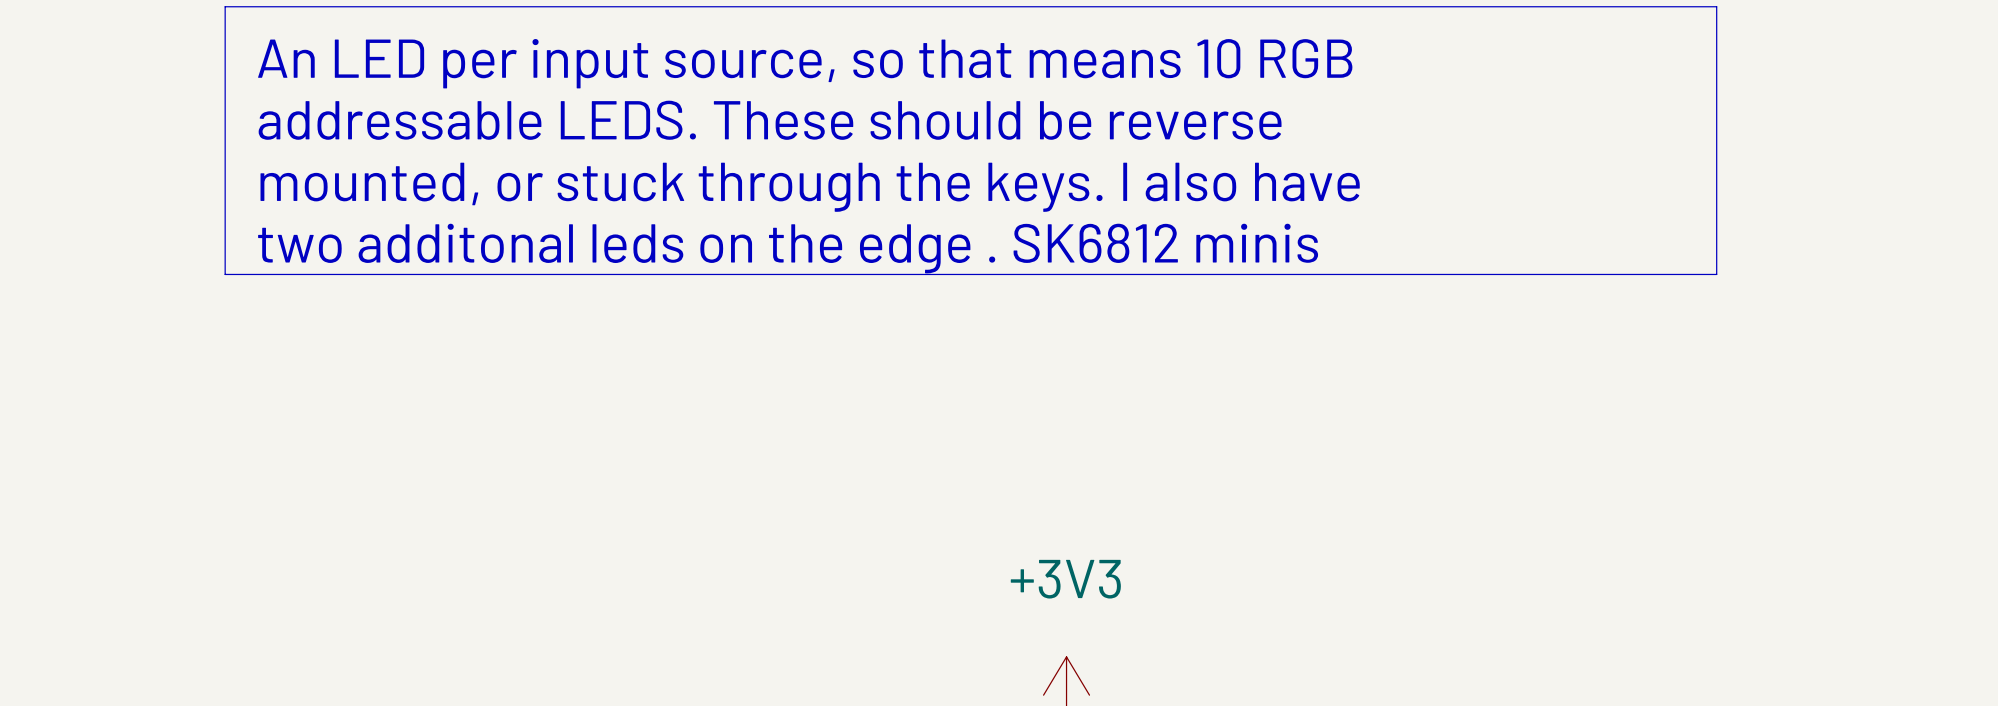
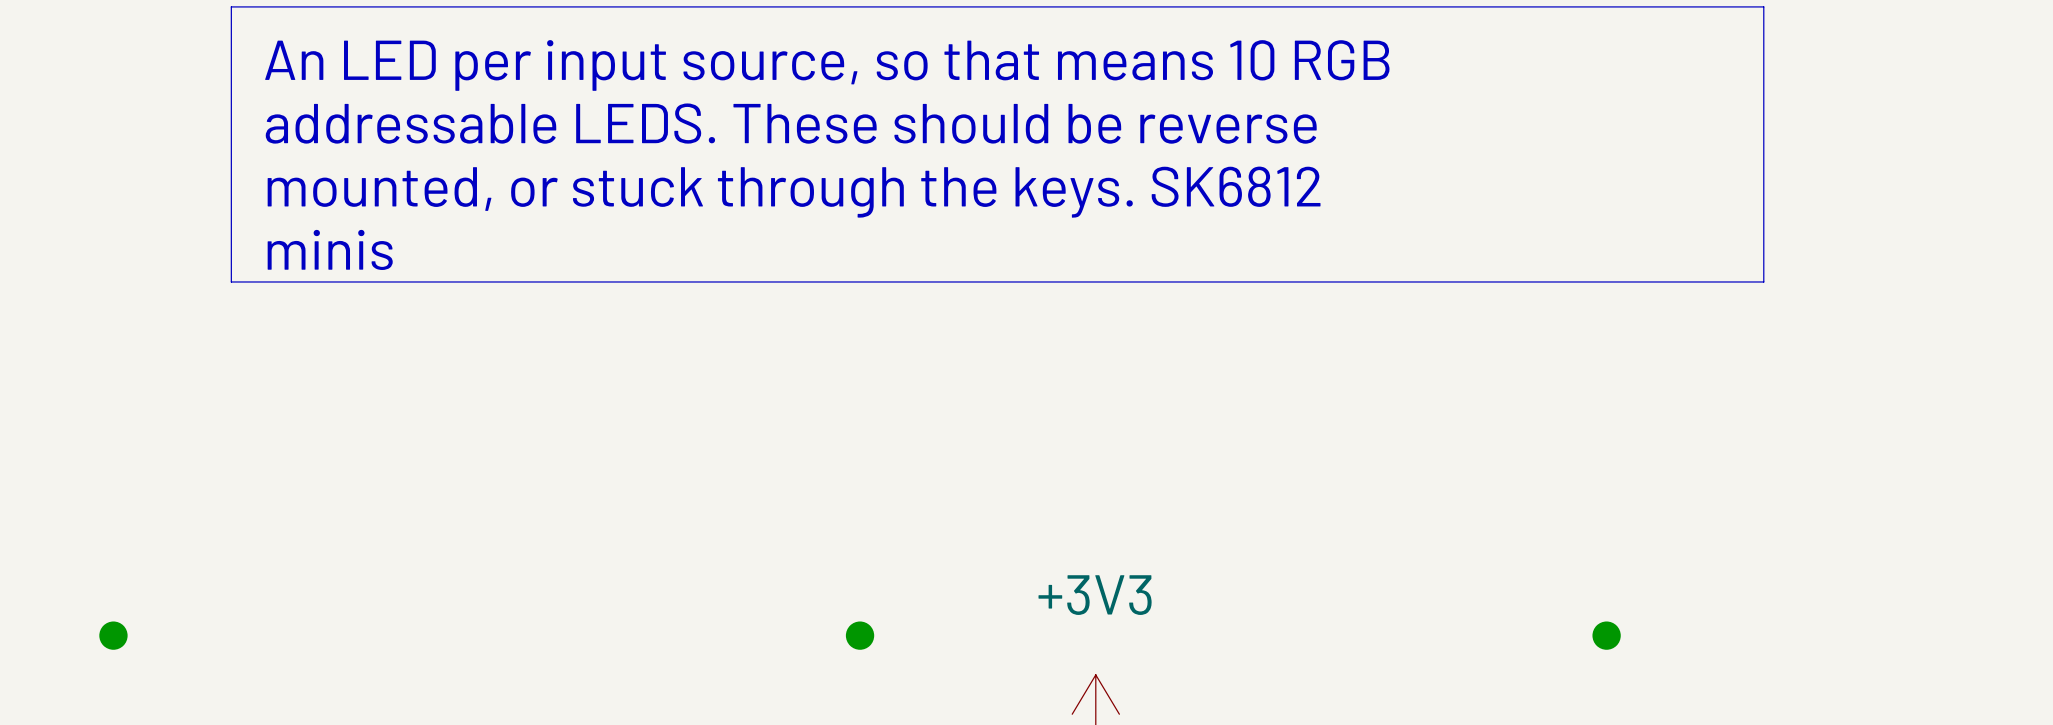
text: mounted, or stuck through the keys. I also have (810, 187) -> mounted, or stuck through the keys. SK6812 (794, 192)
text: two additonal leds on the edge . SK6812 minis (788, 248) -> minis (330, 249)
junction: none -> (113, 635)
junction: none -> (860, 635)
junction: none -> (1606, 635)

